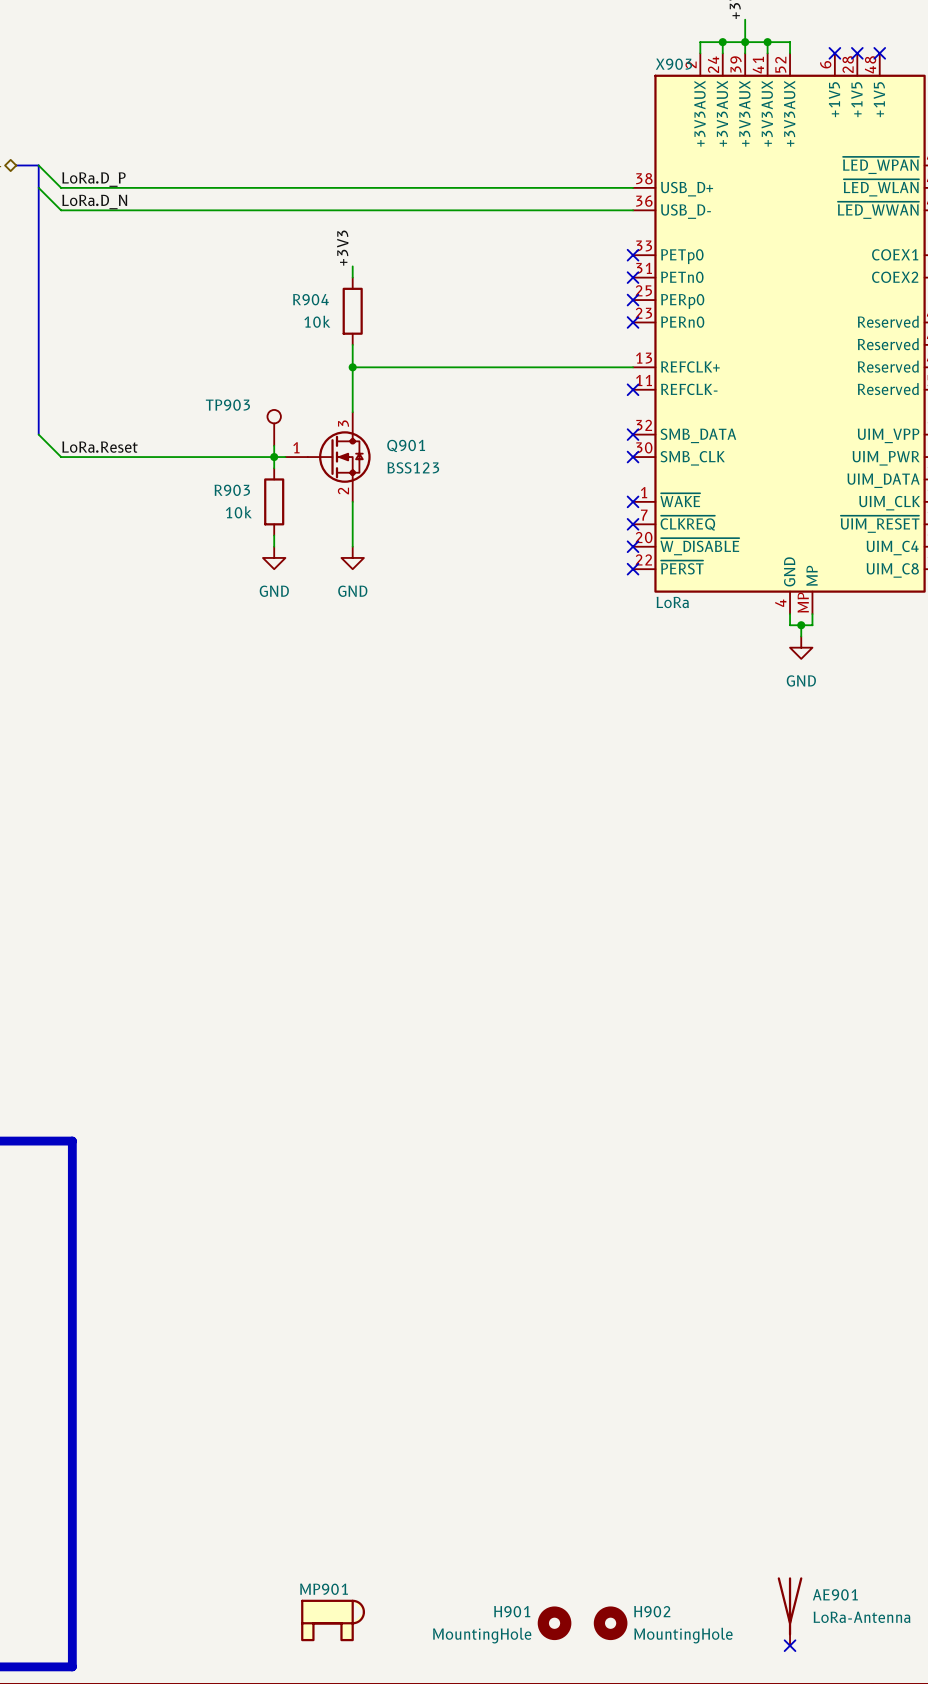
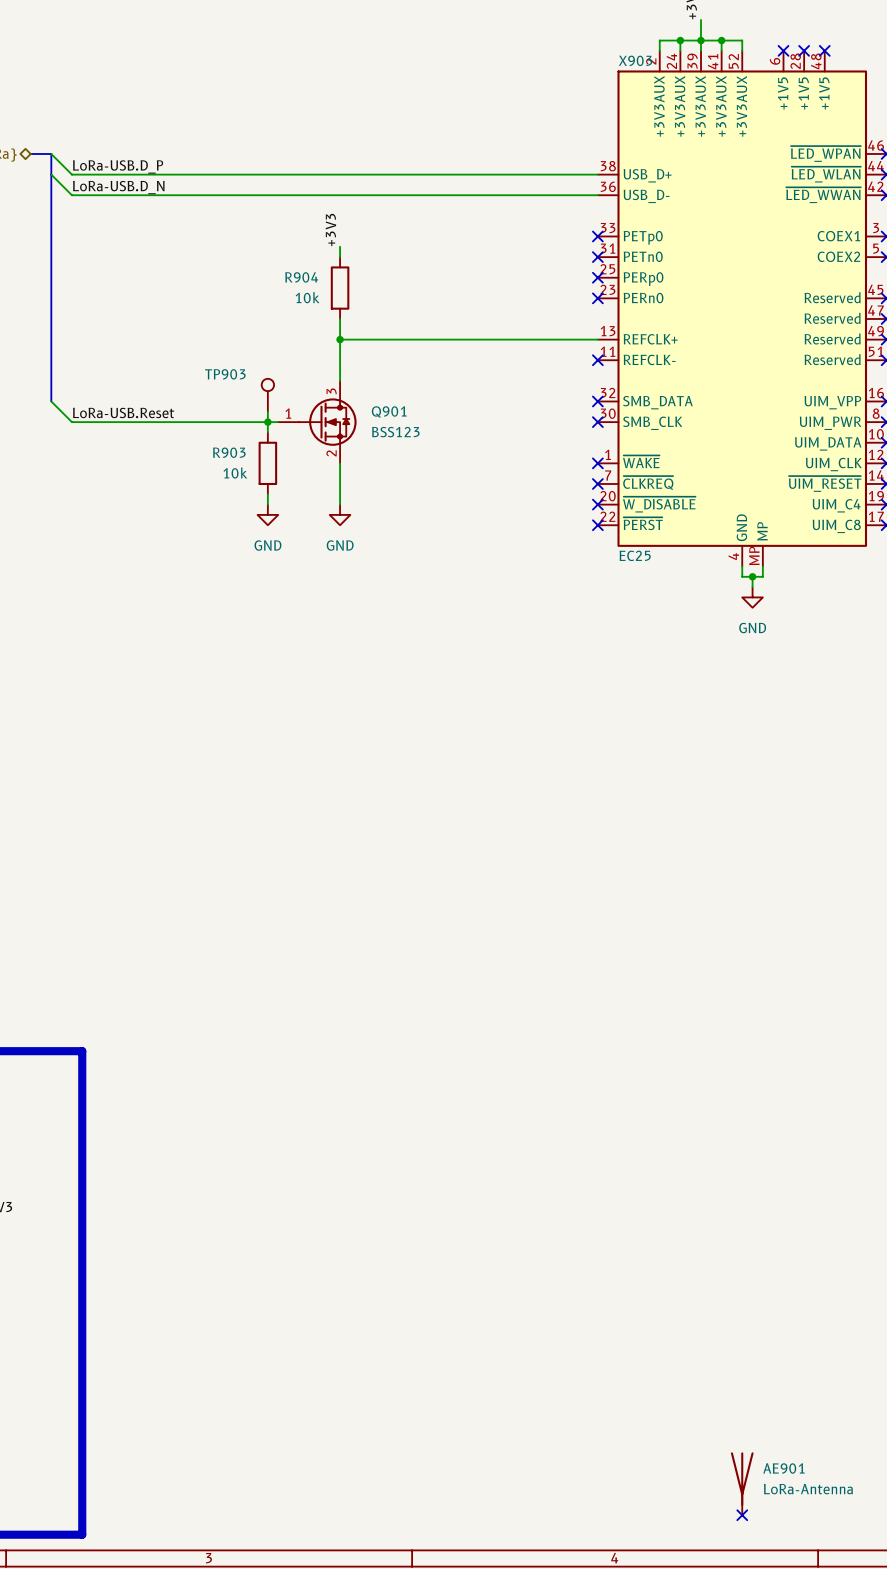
label: LoRa.D_P (93, 179) -> LoRa-USB.D_P (118, 166)
label: LoRa.D_N (94, 202) -> LoRa-USB.D_N (118, 187)
label: LoRa.Reset (100, 447) -> LoRa-USB.Reset (123, 412)
X903 value: LoRa (672, 602) -> EC25 (635, 555)
MP901: (333, 1620) -> none
H901: MountingHole (554, 1623) -> none
H902: MountingHole (610, 1623) -> none

